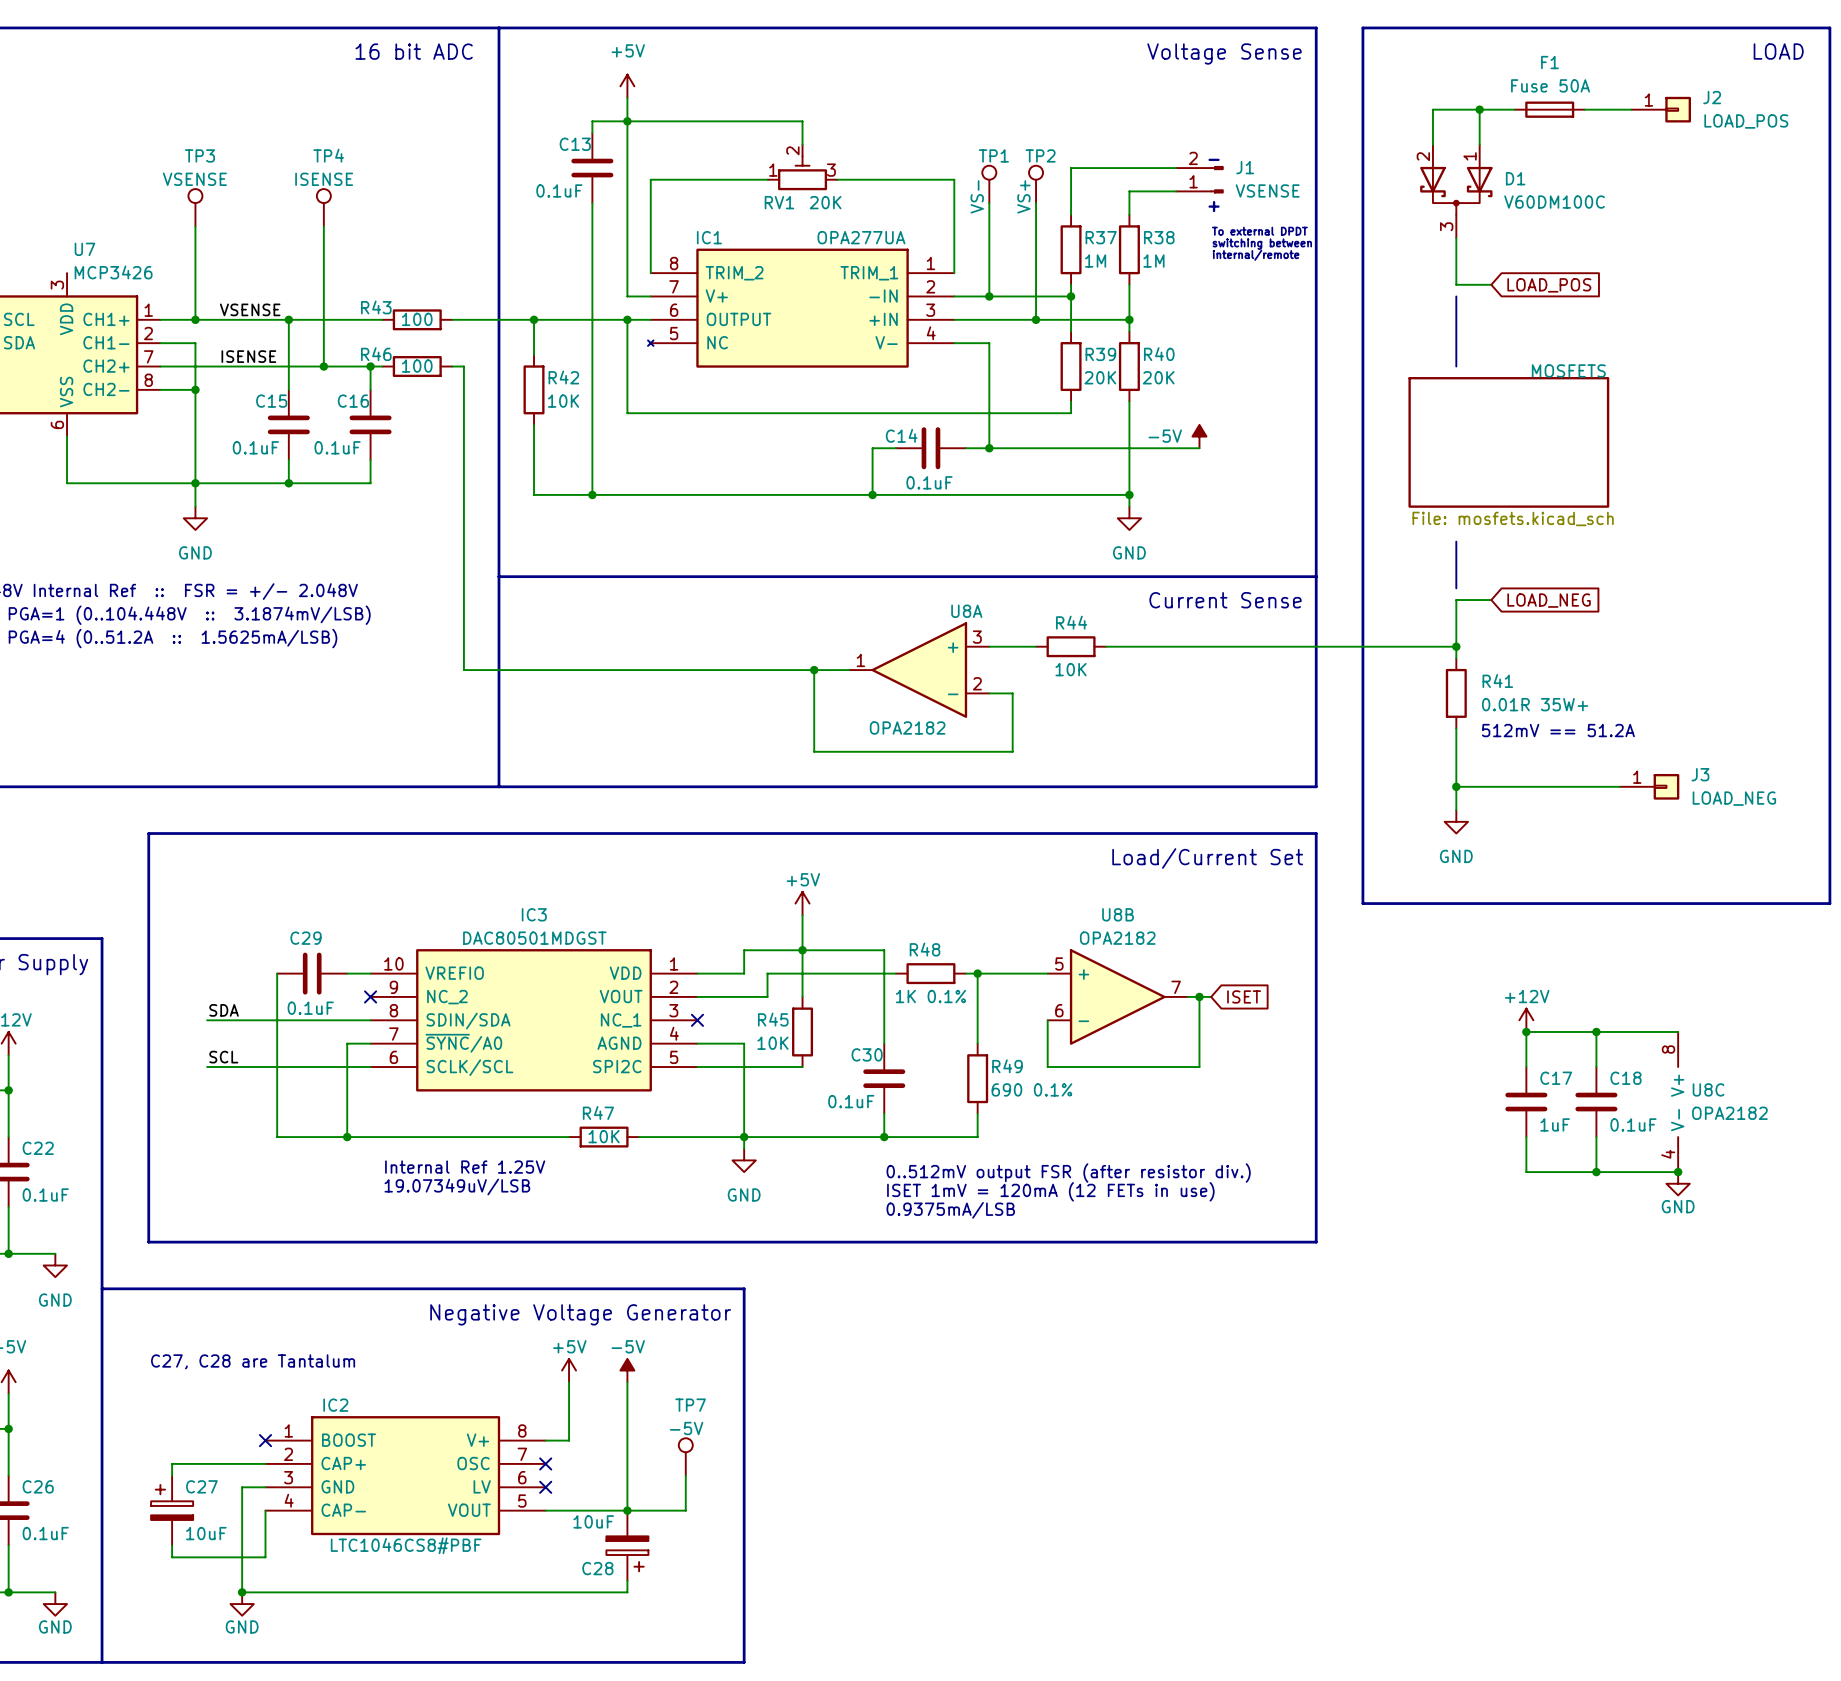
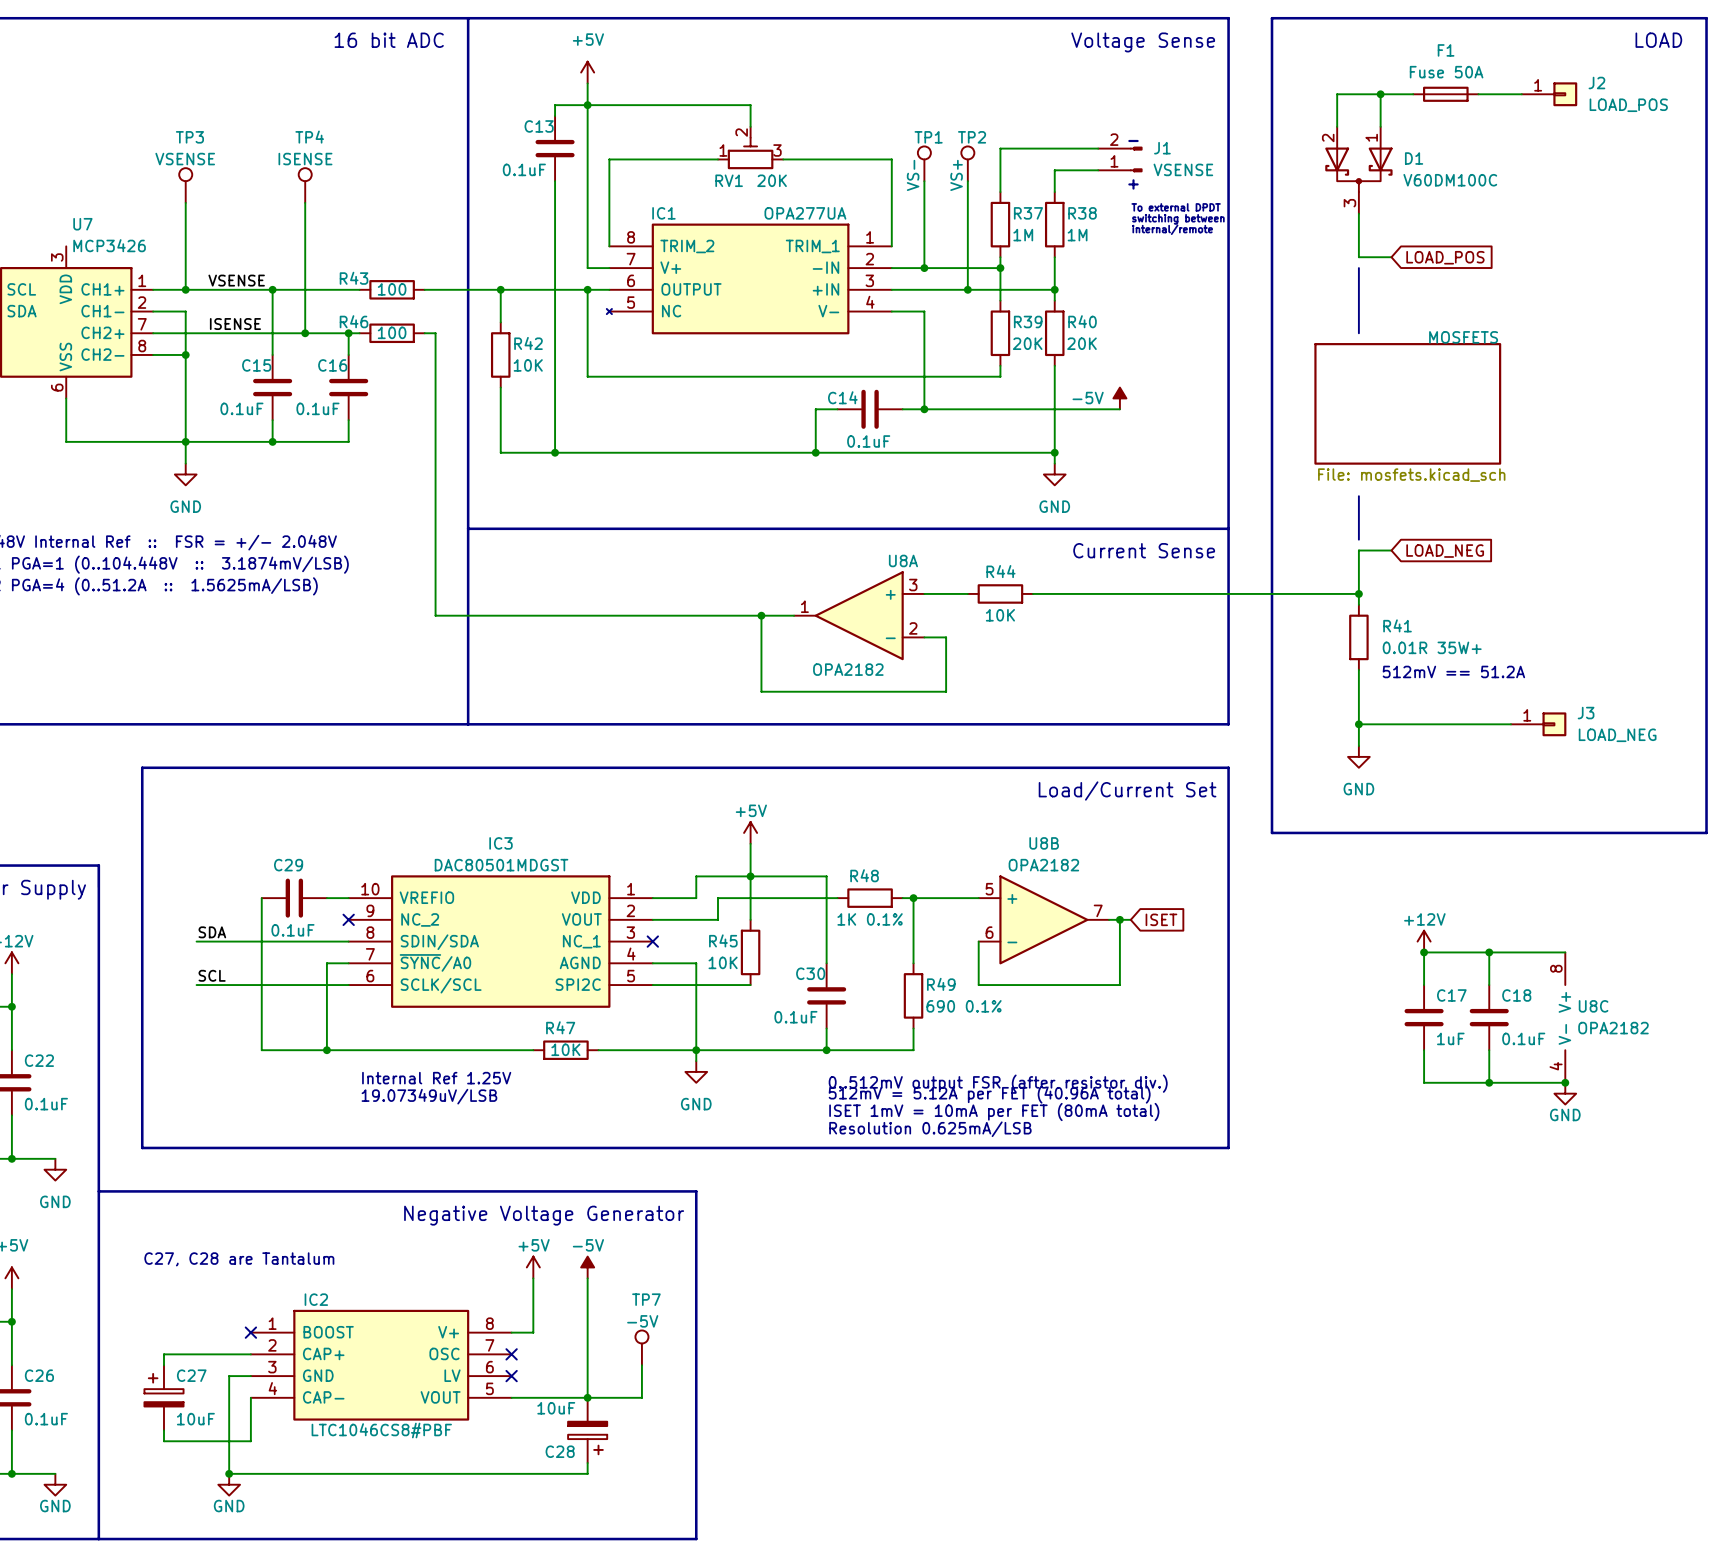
text: none -> 512mV = 5.12A per FET (40.96A total) (989, 1094)
text: ISET 1mV = 120mA (12 FETs in use) (1050, 1191) -> ISET 1mV = 10mA per FET (80mA total) (994, 1112)
text: 0.9375mA/LSB (950, 1210) -> none
text: none -> Resolution 0.625mA/LSB (930, 1129)

